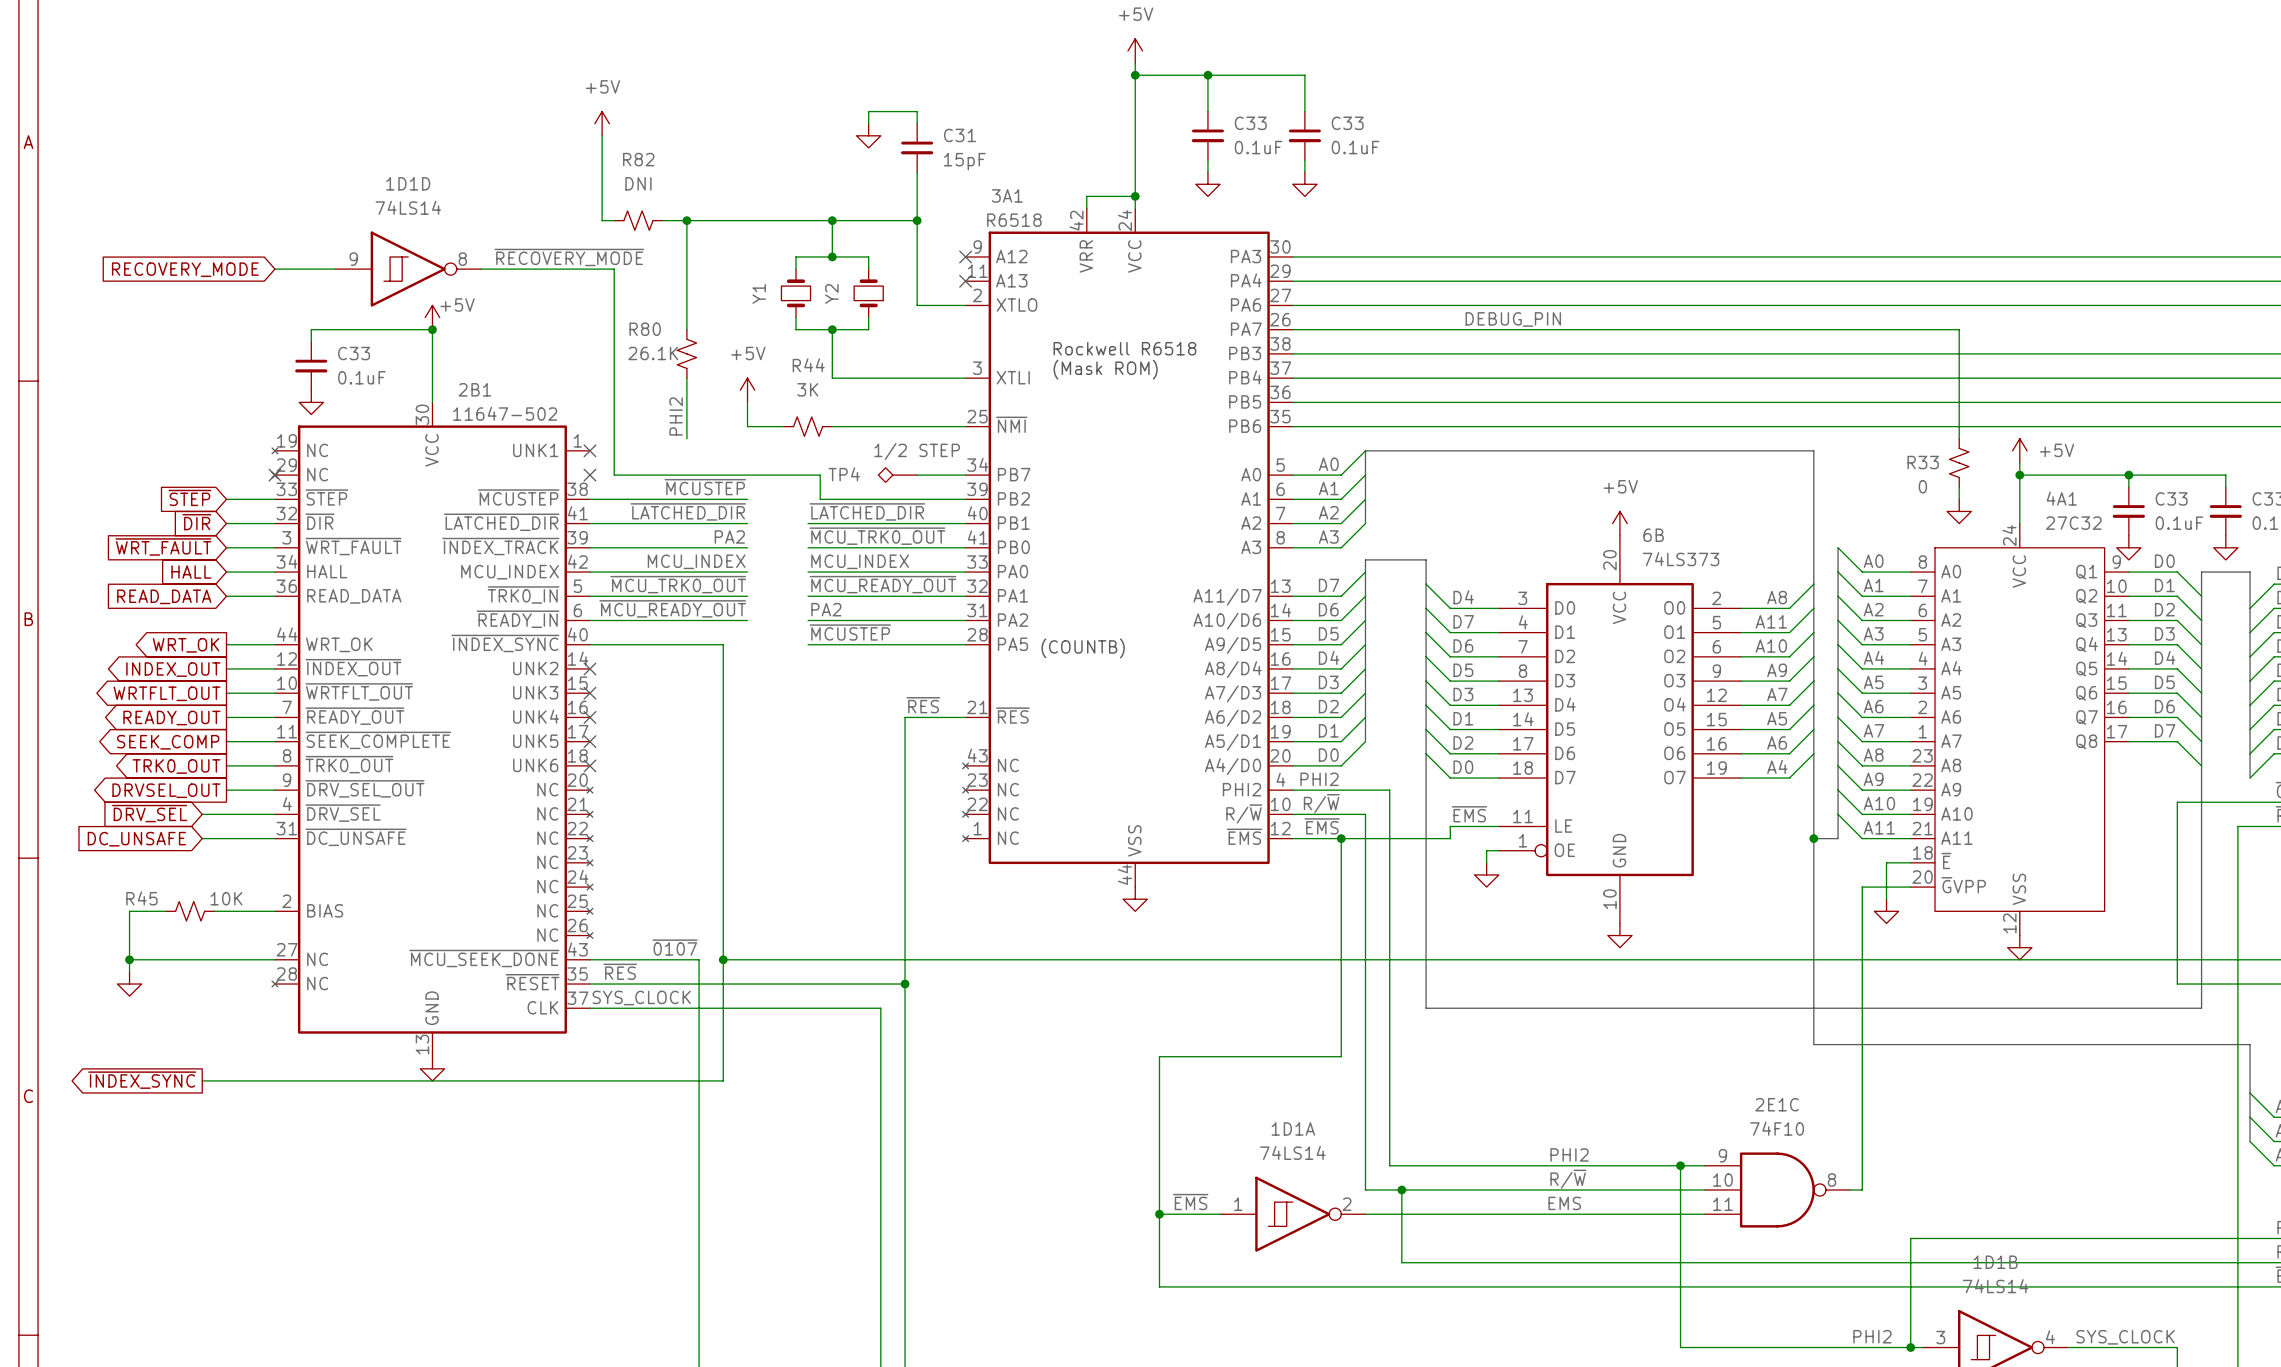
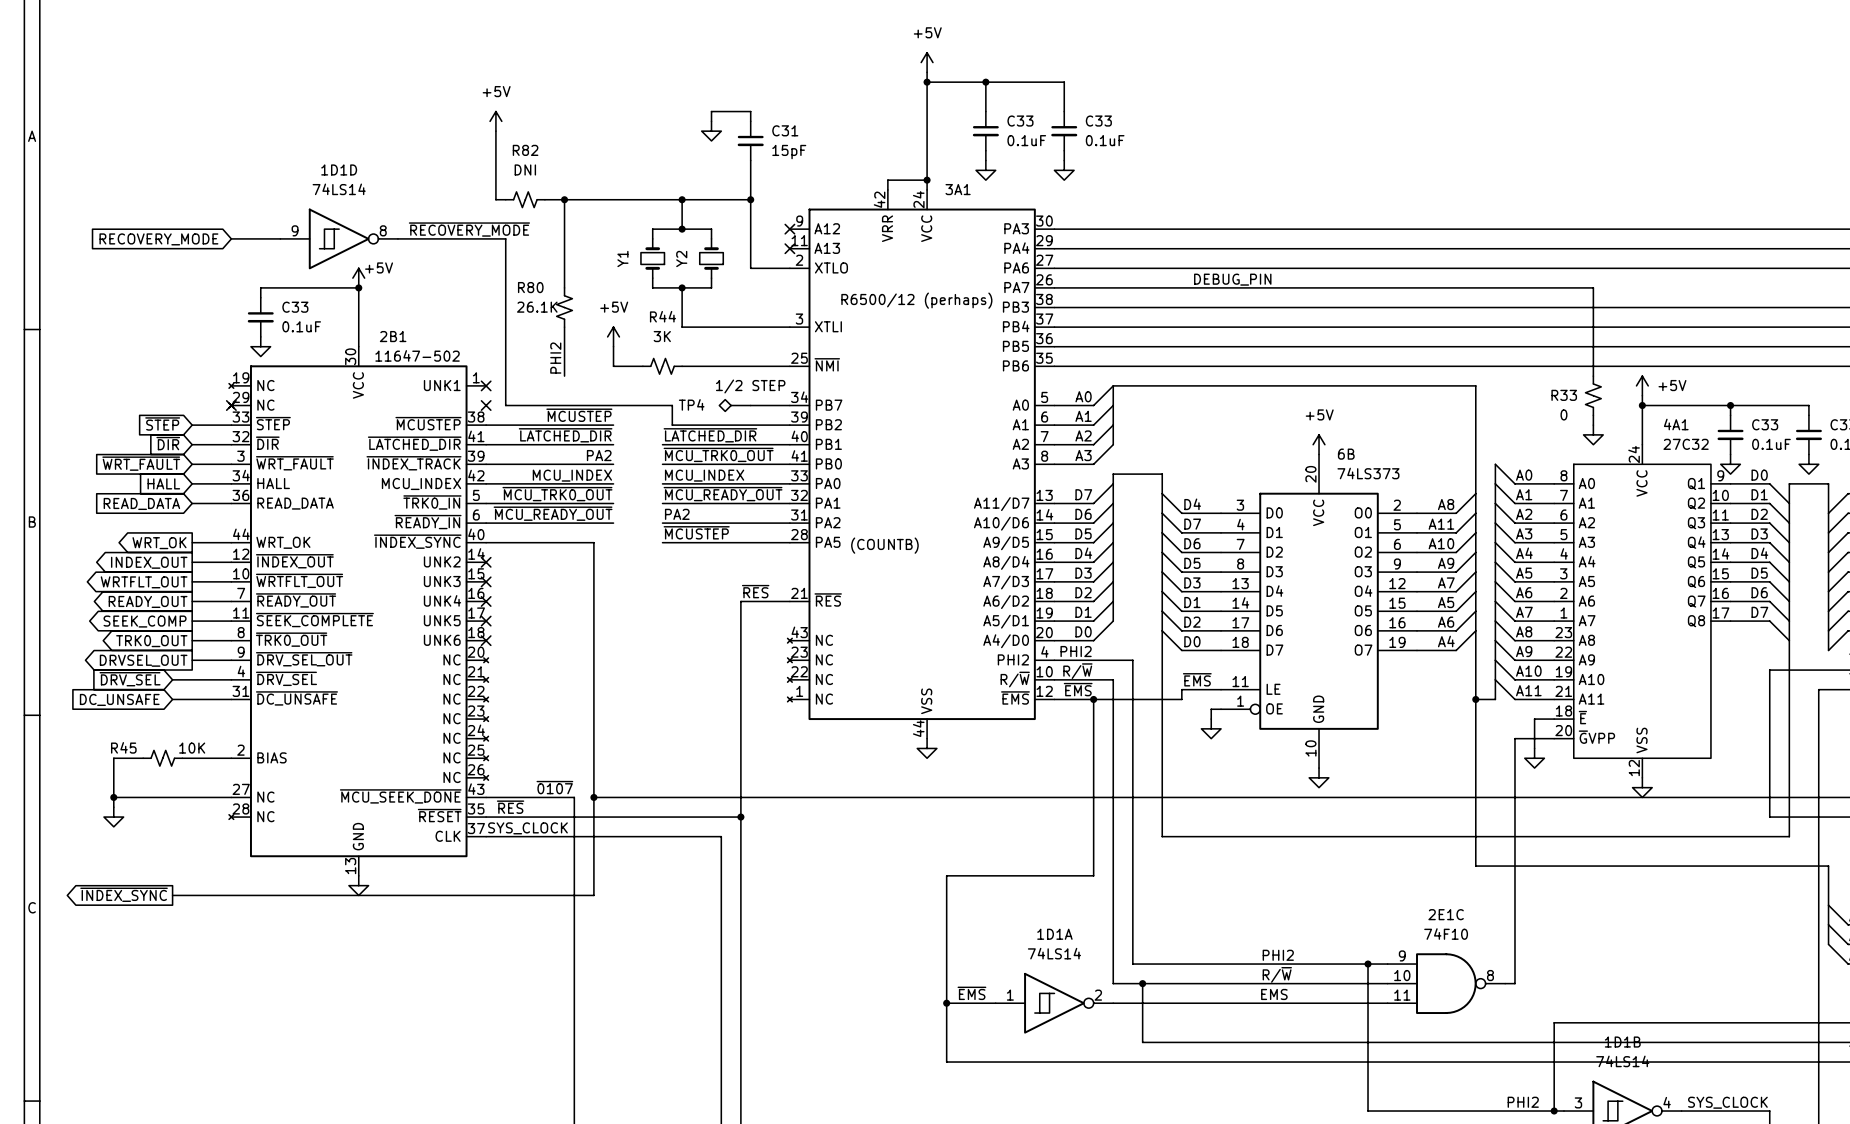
3A1 name position: 3A1 (1007, 195) -> 3A1 (958, 189)
3A1 value: R6518 (1014, 220) -> none
text: none -> R6500/12 (perhaps) (916, 300)
text: Rockwell R6518 (1124, 348) -> none
text: (Mask ROM) (1105, 369) -> none

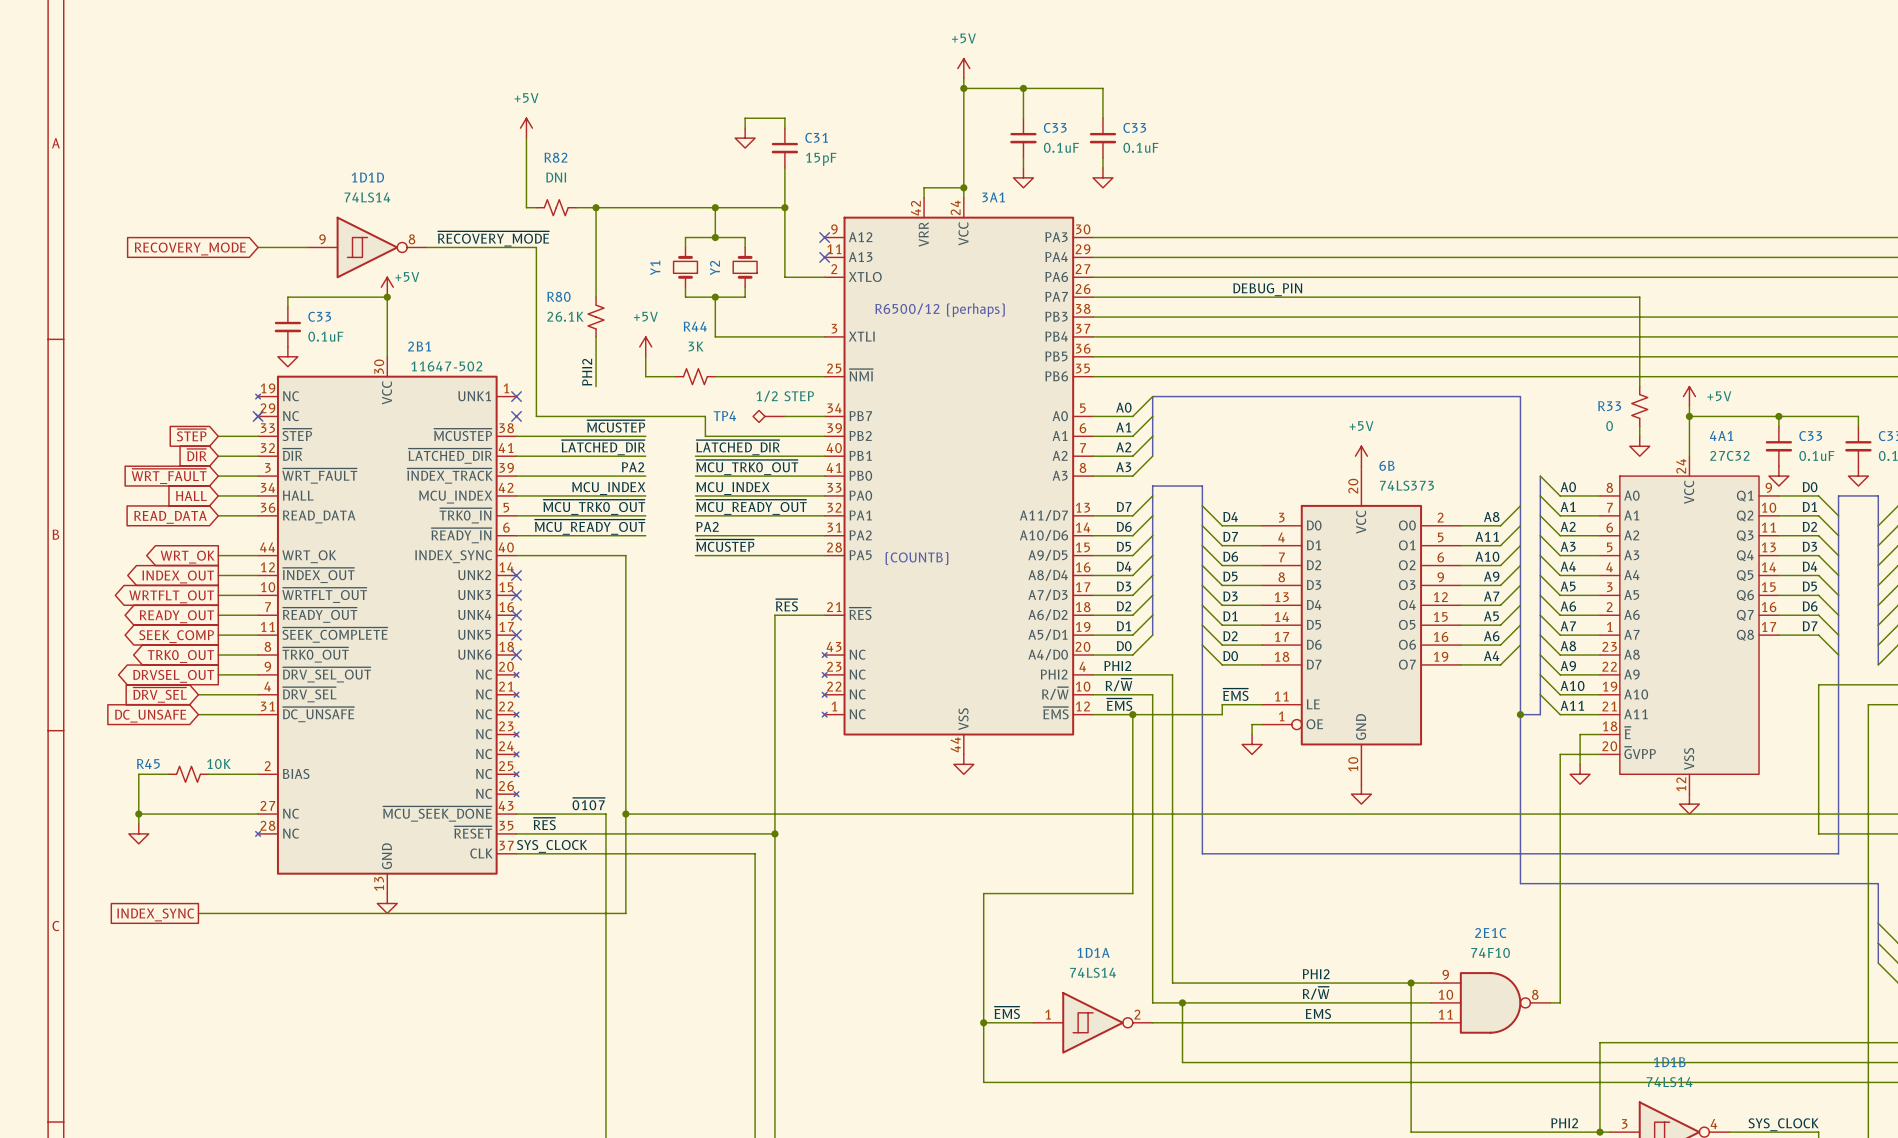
2B1 pin name: ~{INDEX_SYNC} (417, 541) -> INDEX_SYNC (453, 556)
global label shape: output (124, 894) -> passive (155, 914)
global label: ~{INDEX_SYNC} (124, 894) -> INDEX_SYNC (155, 914)

